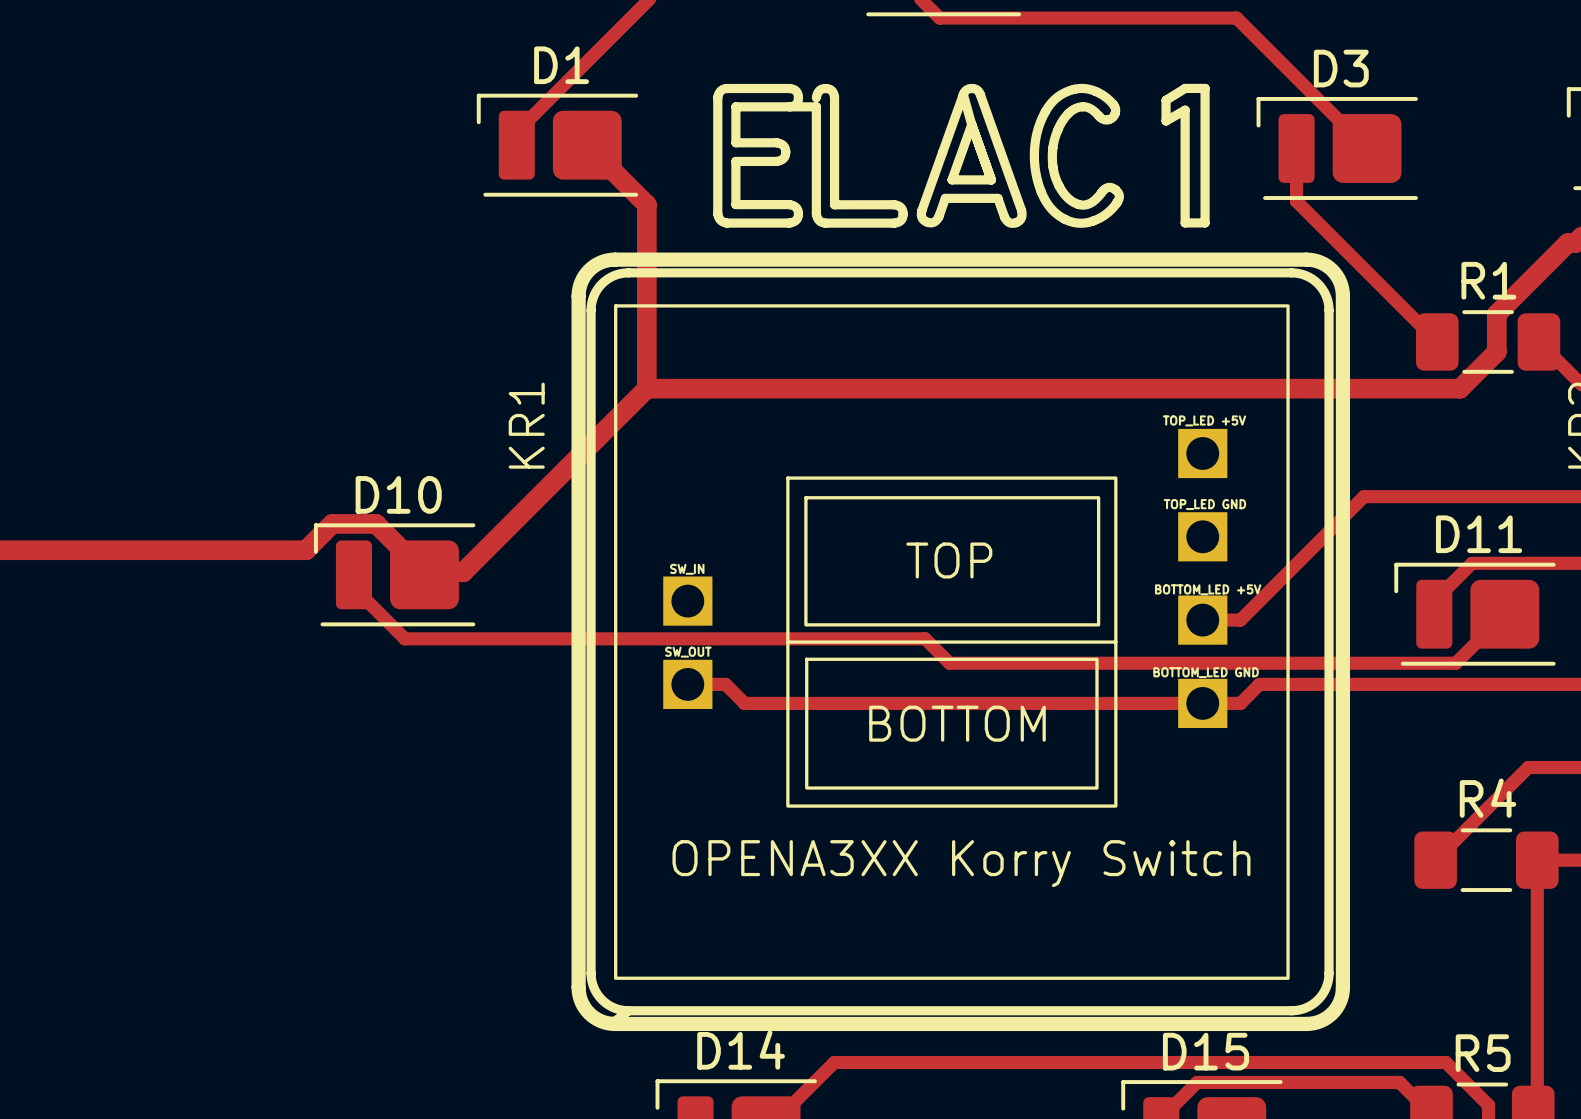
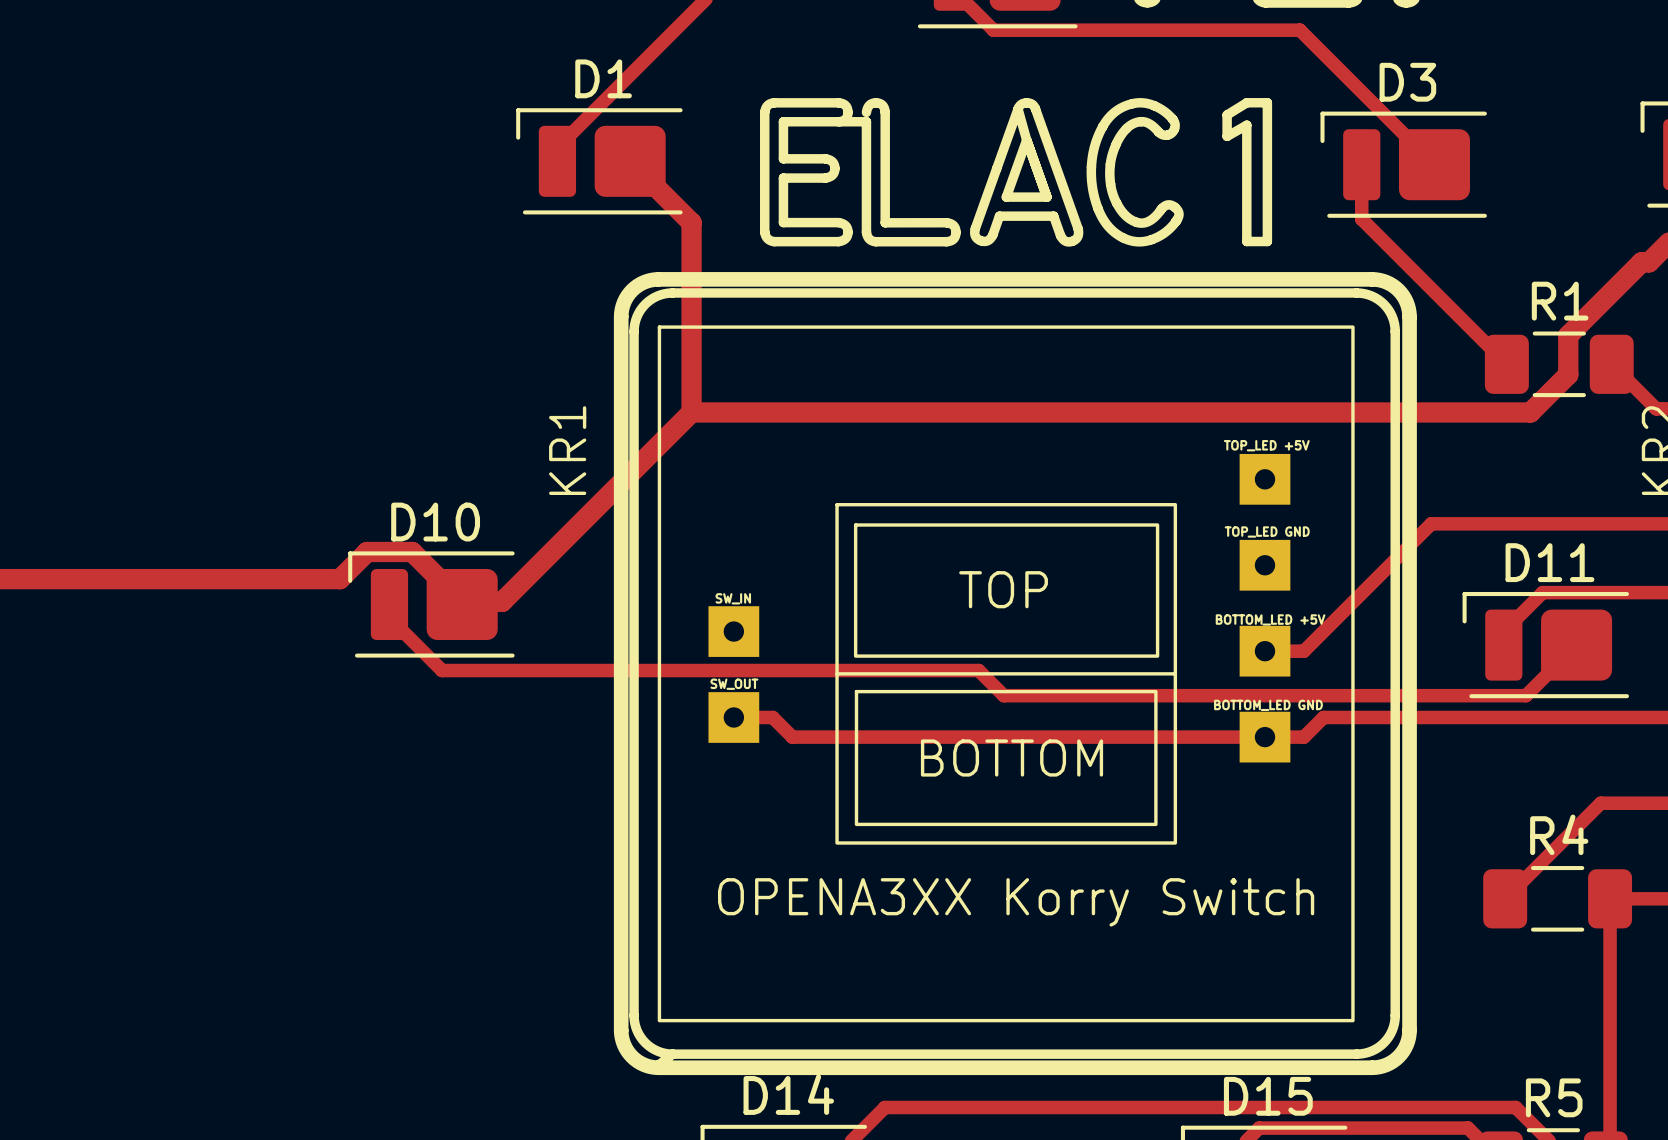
KR1 footprint: [614, 304, 1290, 980] -> [657, 325, 1355, 1023]

